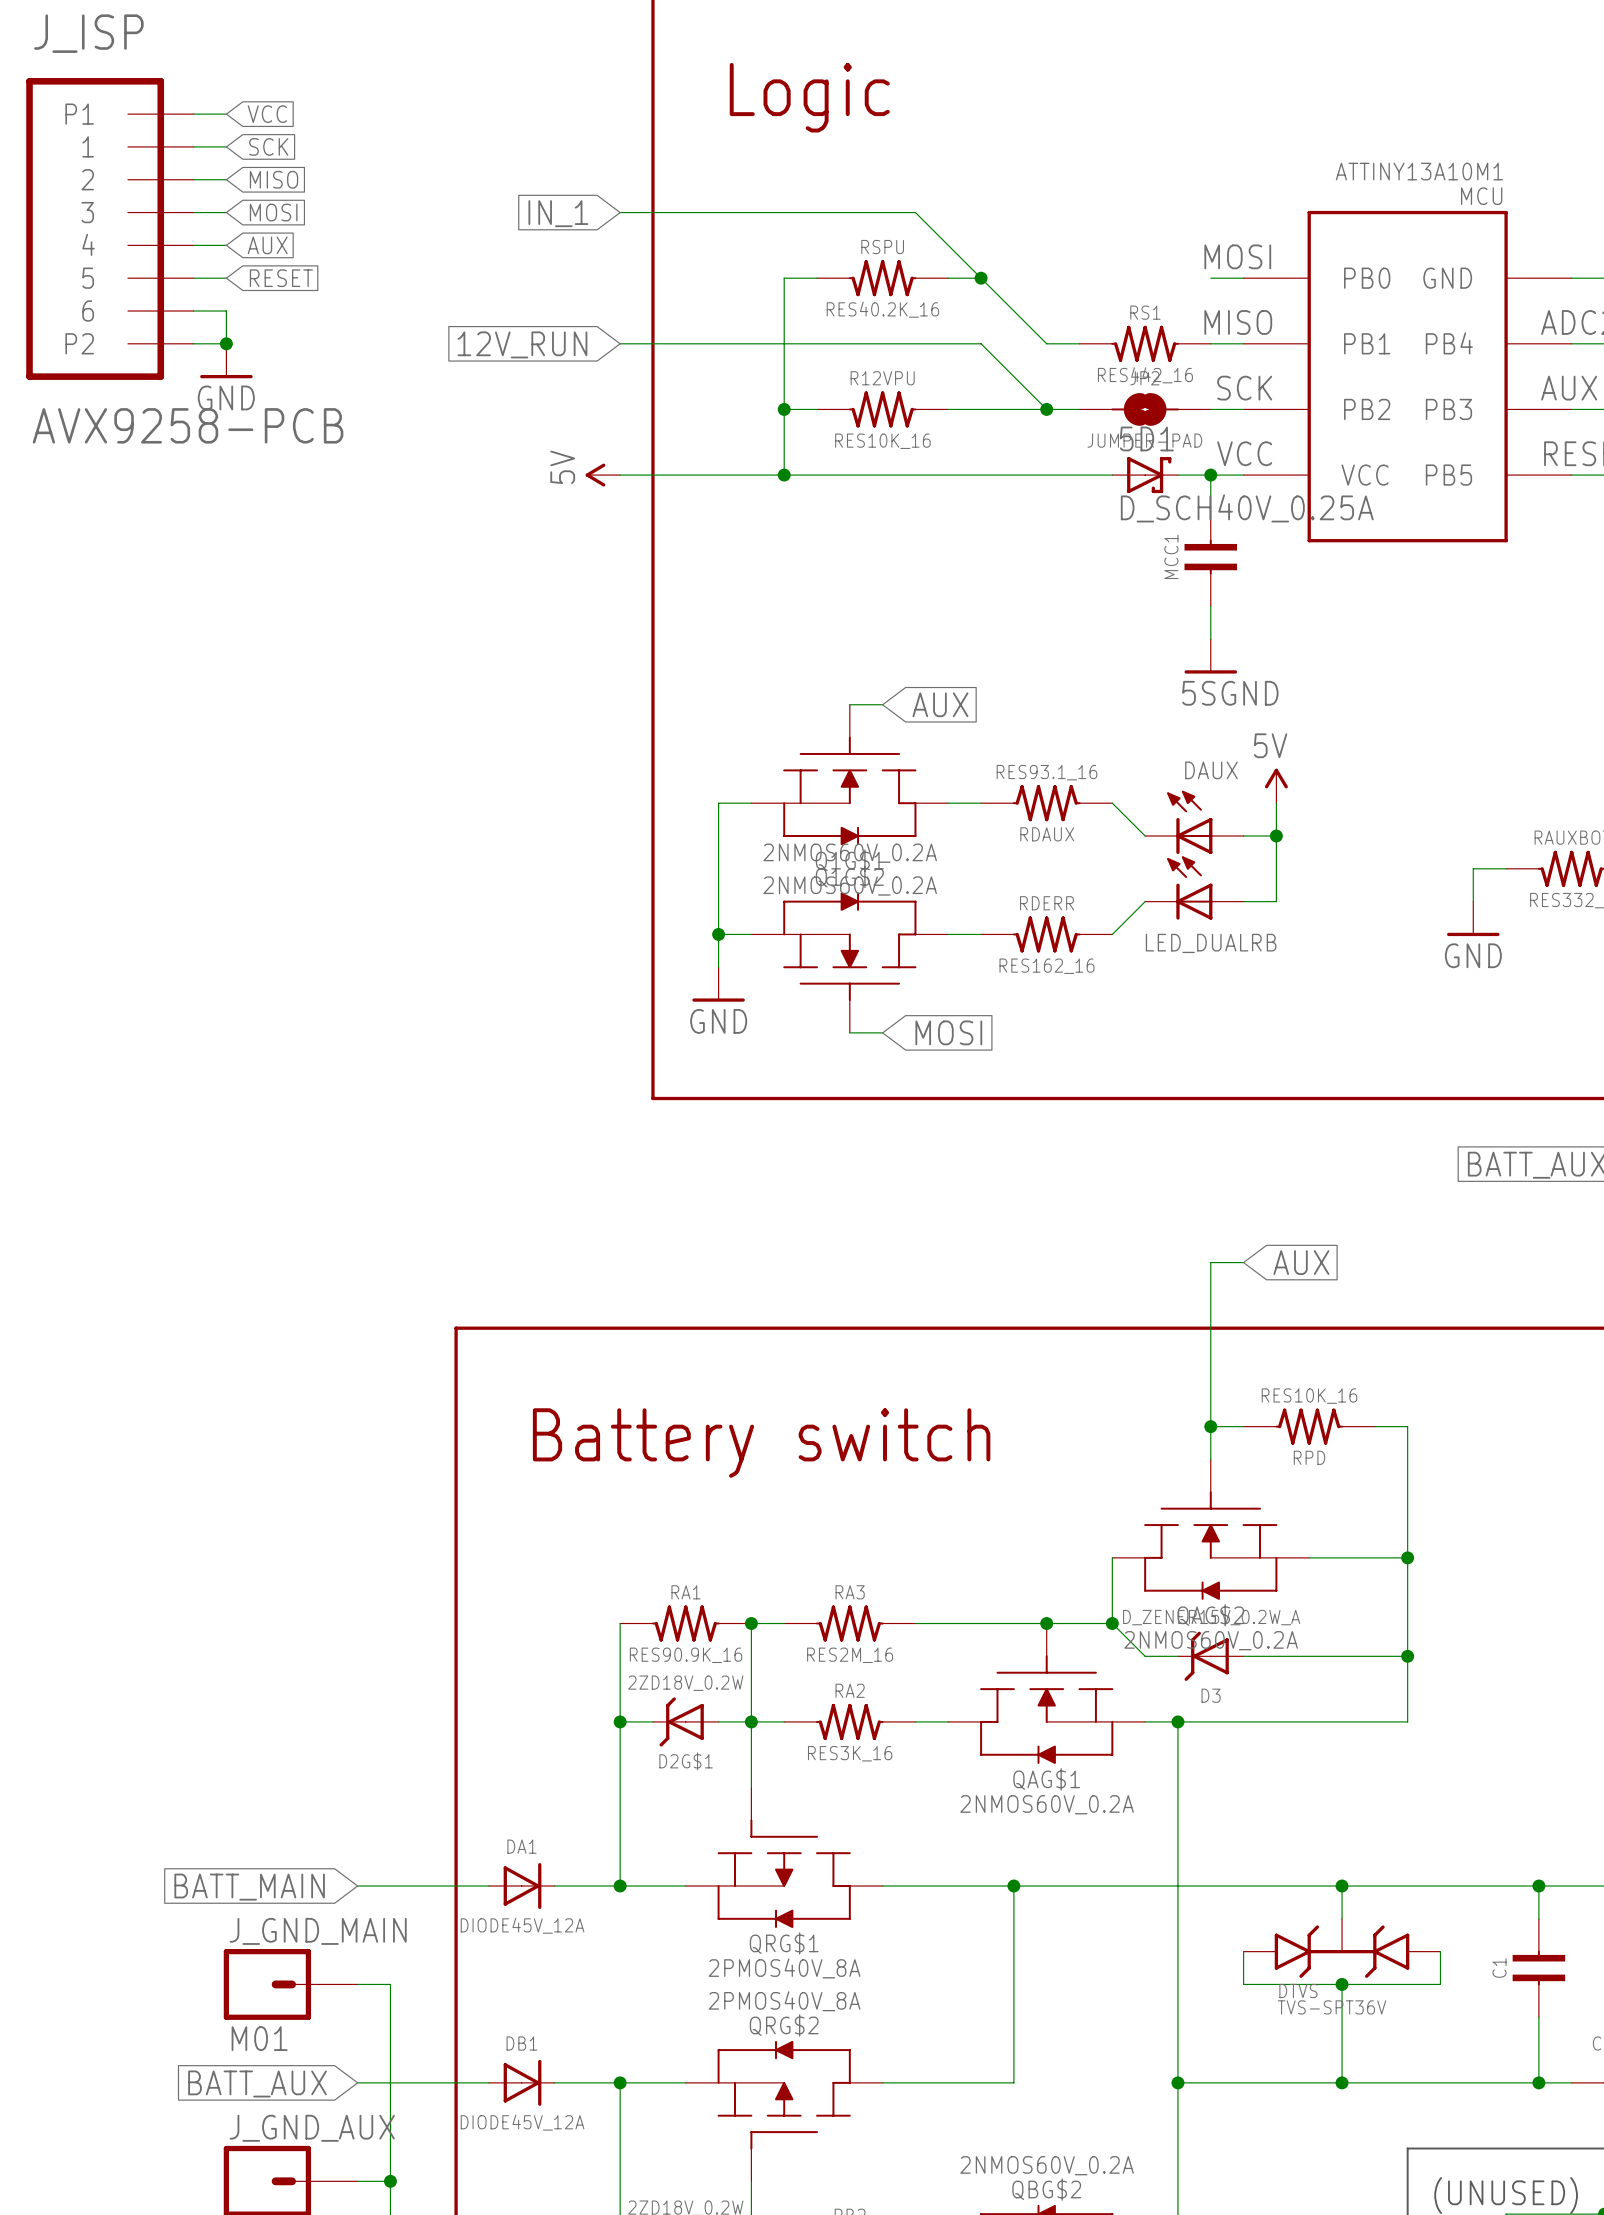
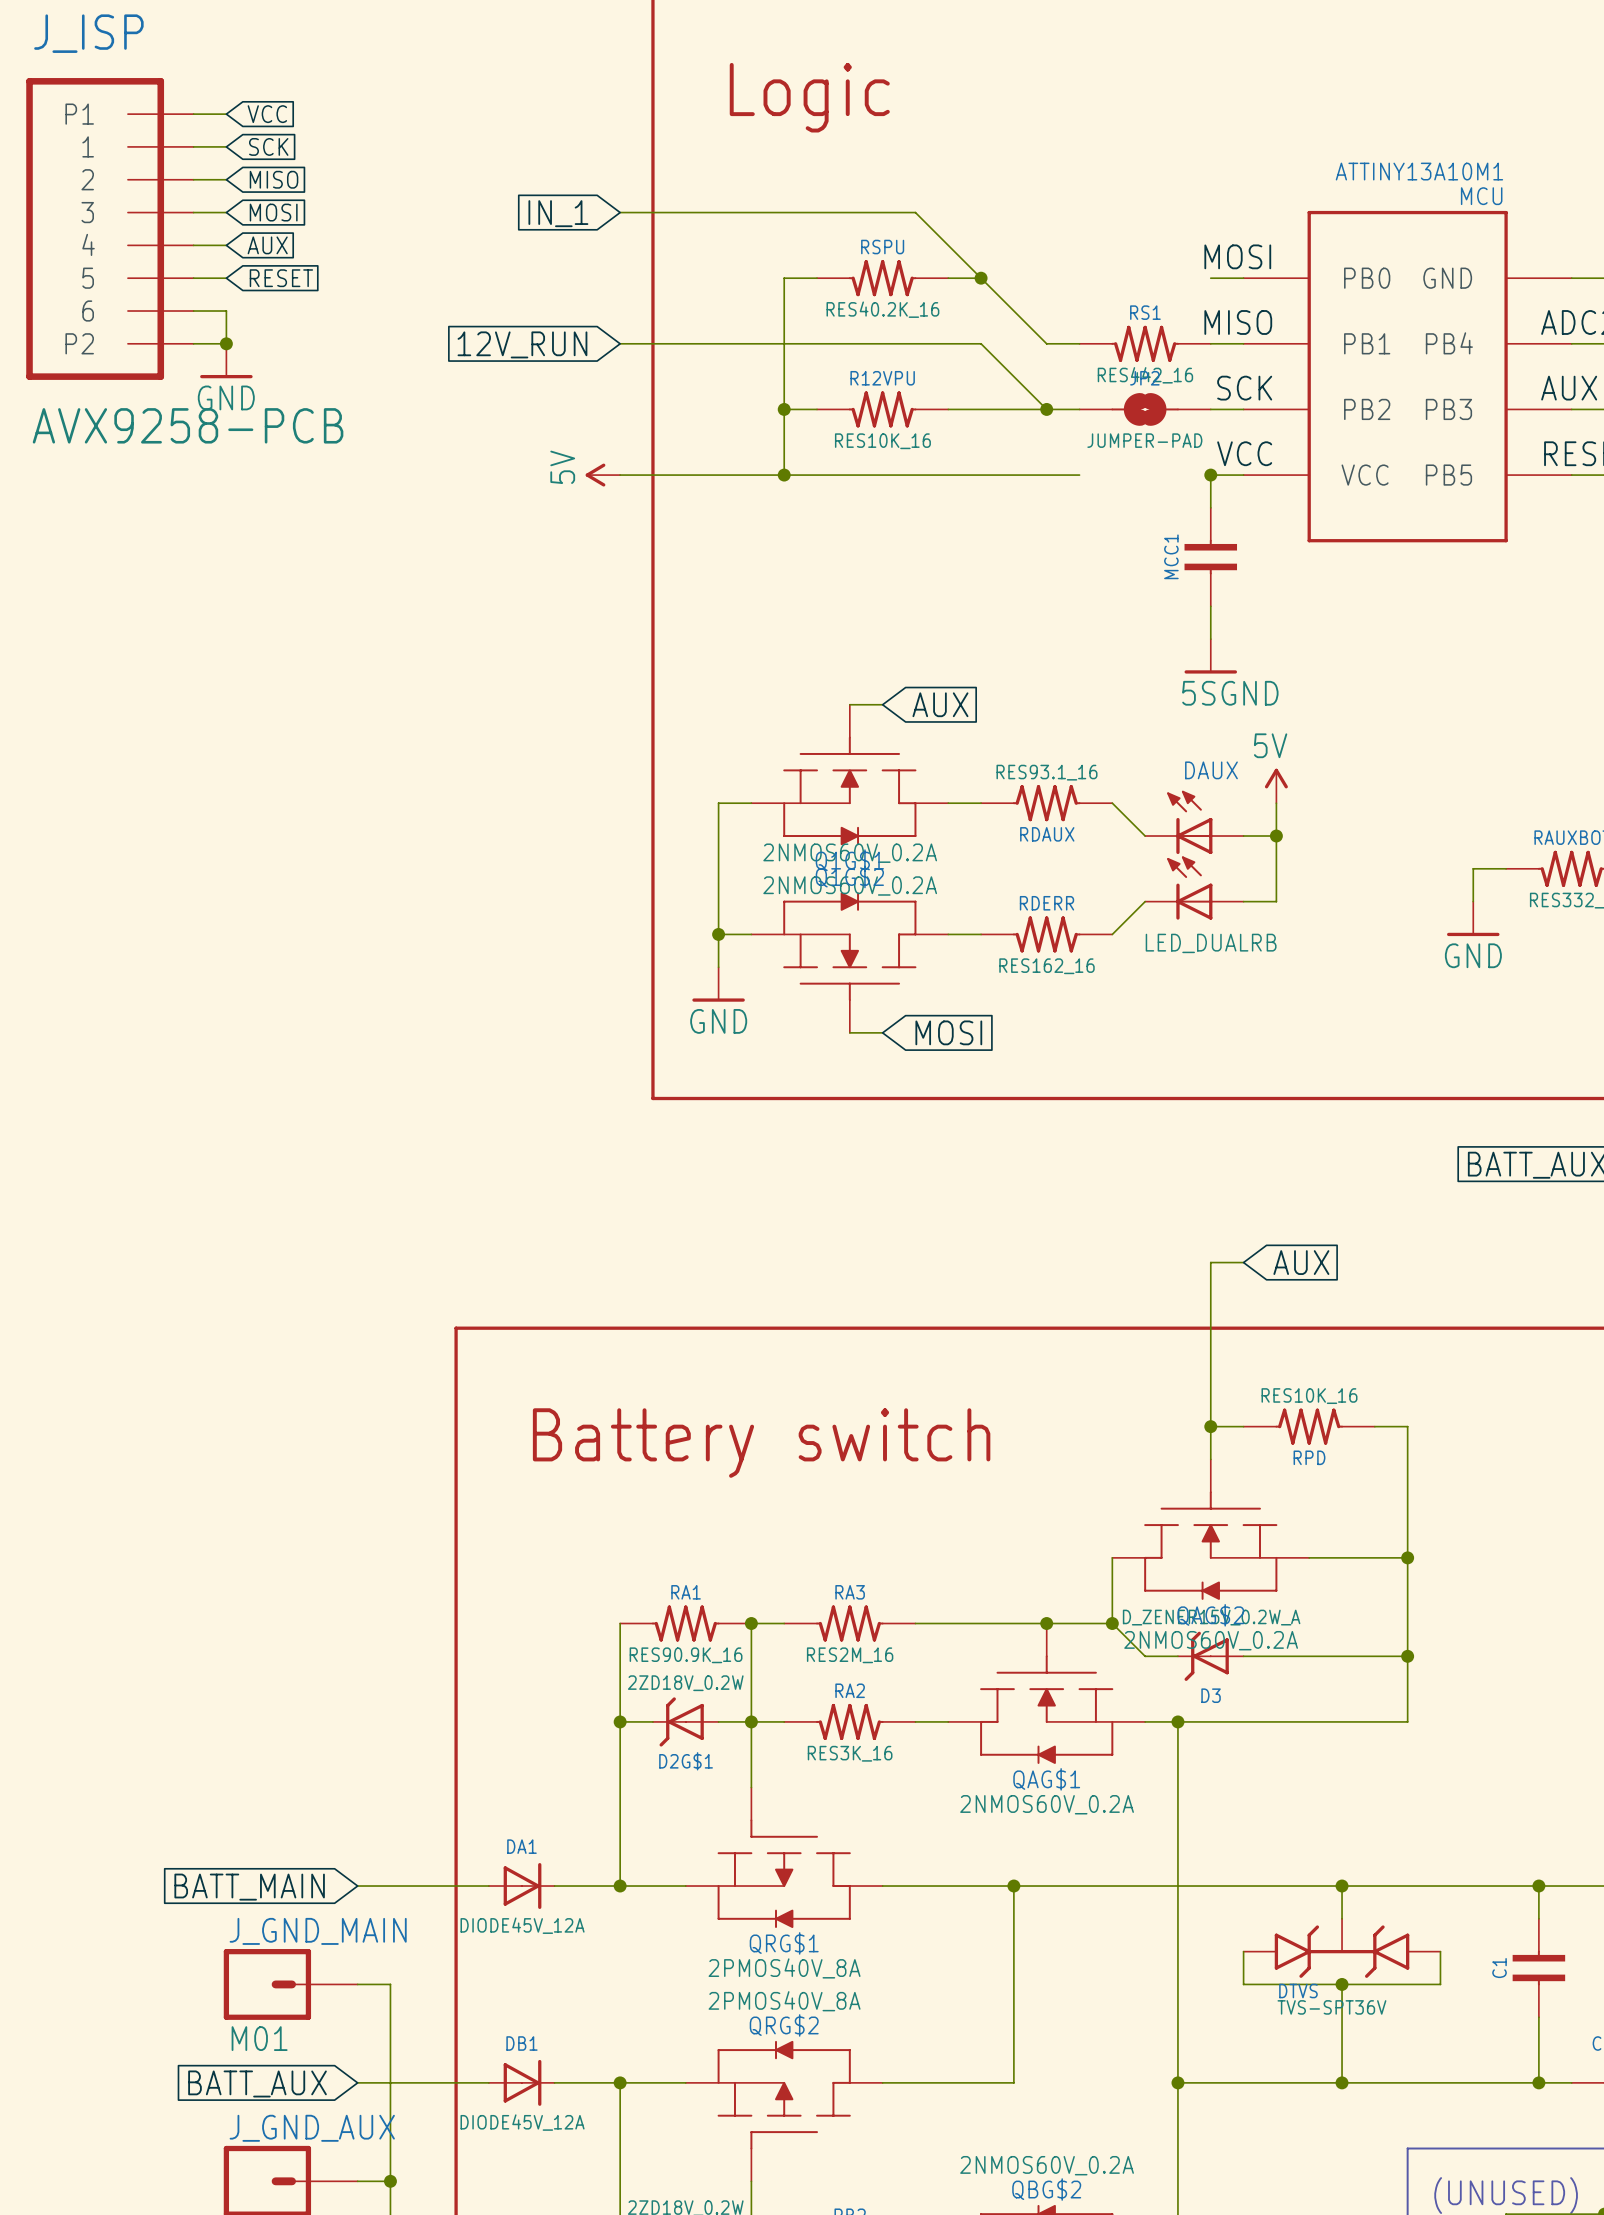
wire: (1079, 475) (1112, 475) -> none
5D1: D_SCH40V_0.25A (1145, 475) -> none
wire: (1177, 475) (1210, 475) -> none

